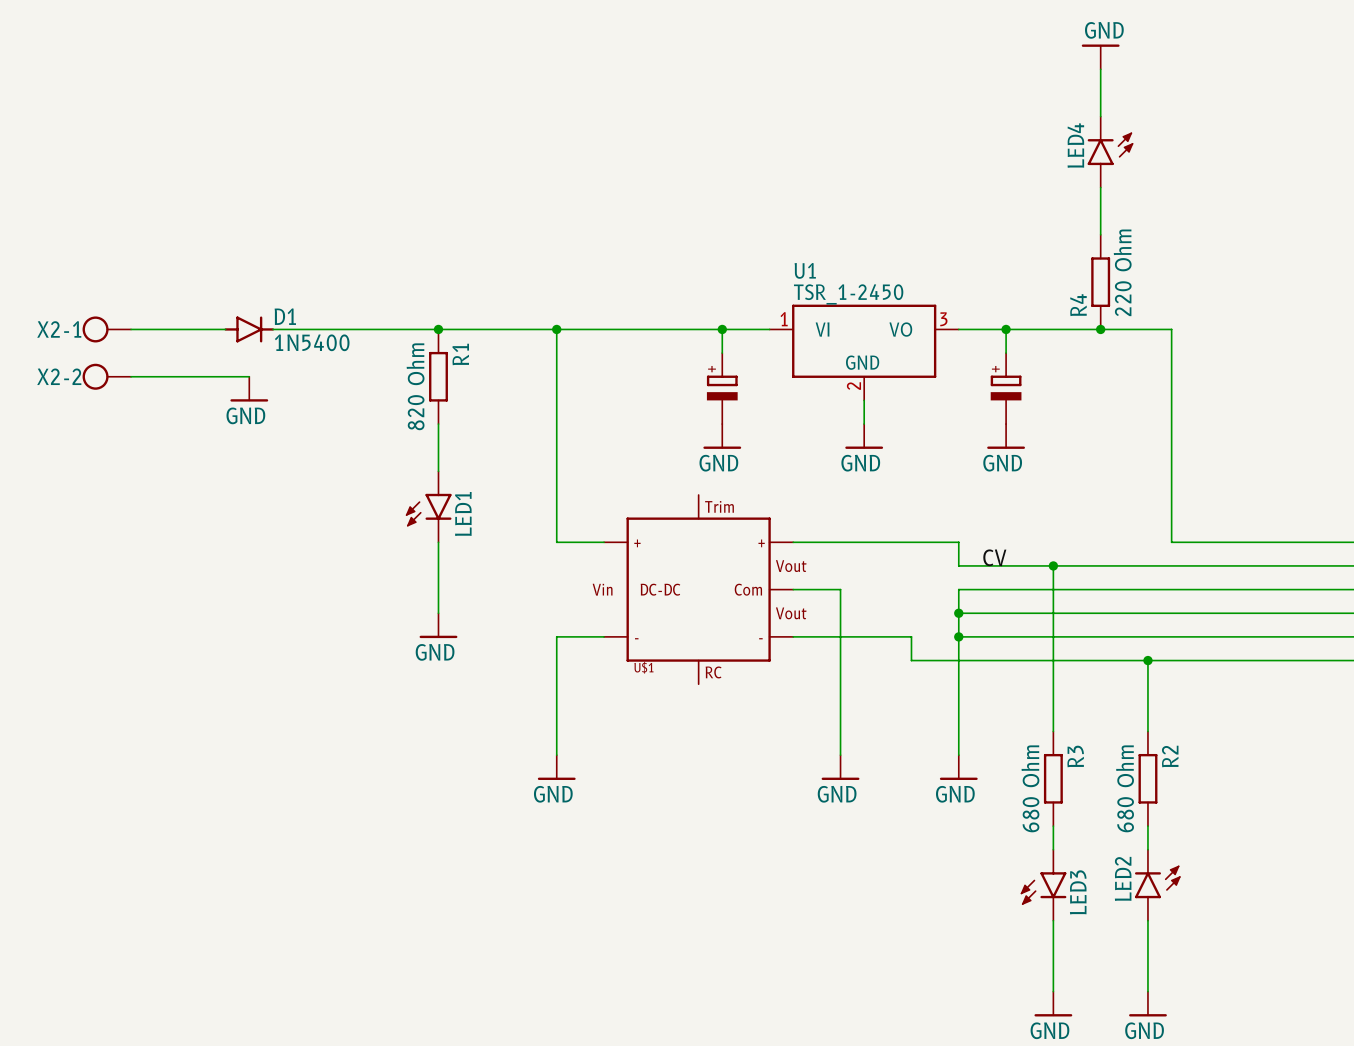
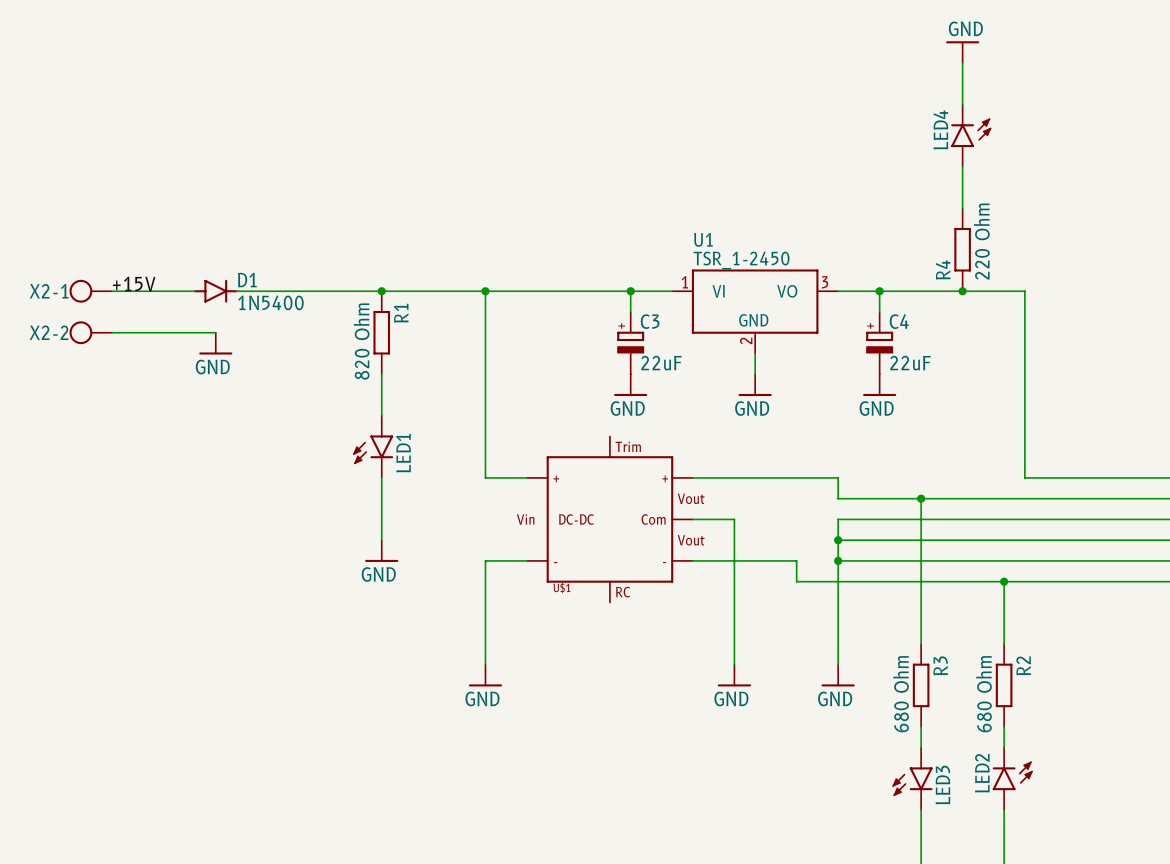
label: none -> +15V (134, 284)
C3: none -> 22uF (630, 343)
C4: none -> 22uF (879, 343)
label: CV (994, 557) -> none

